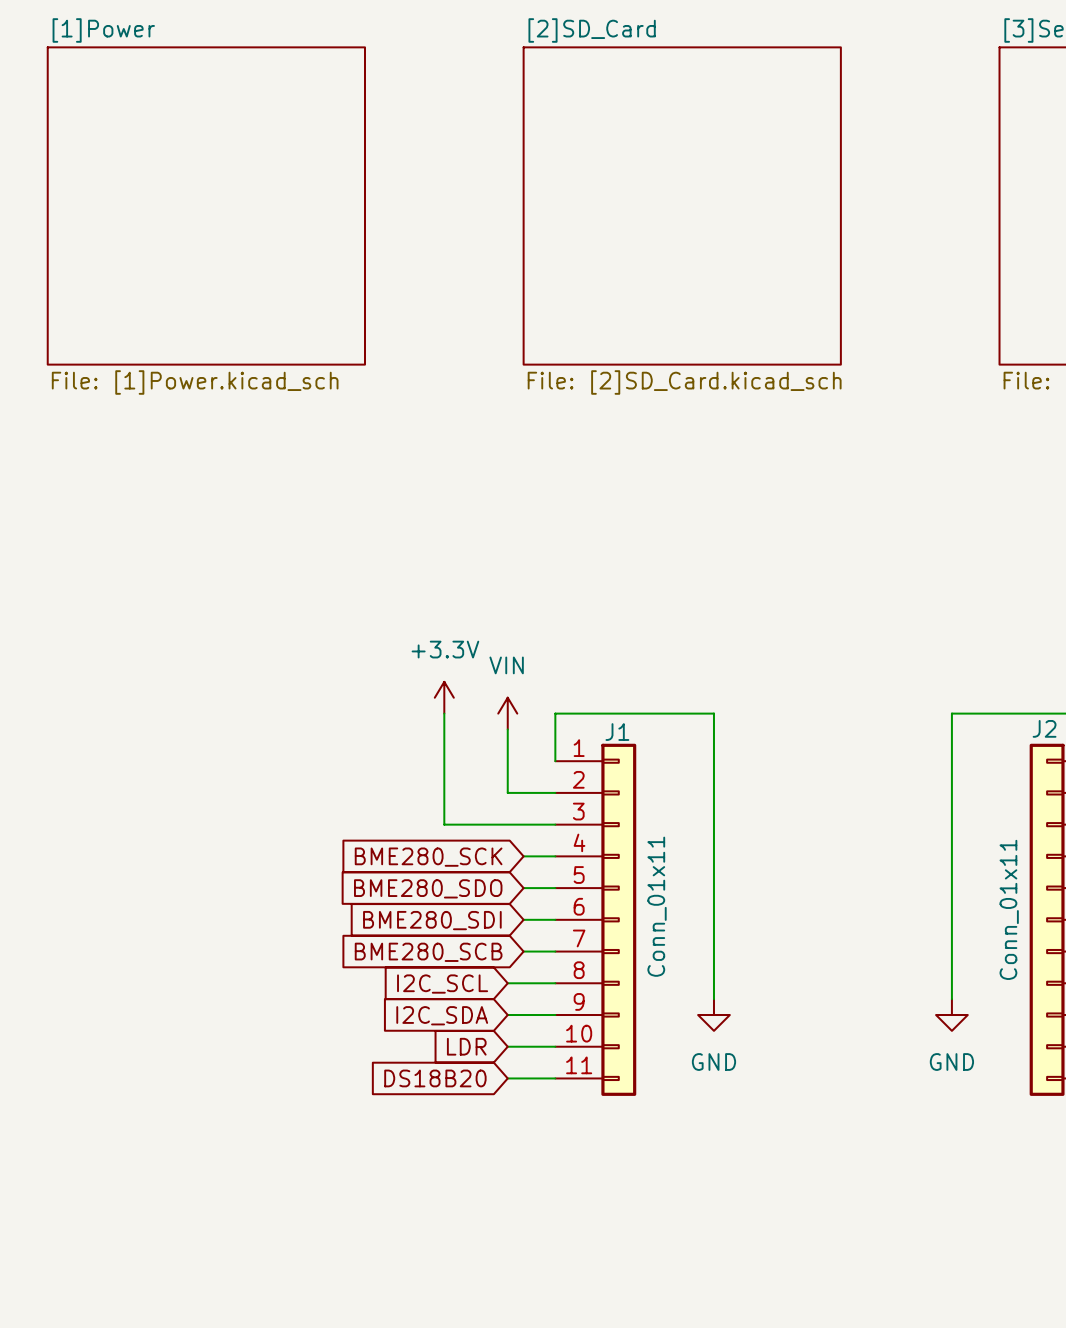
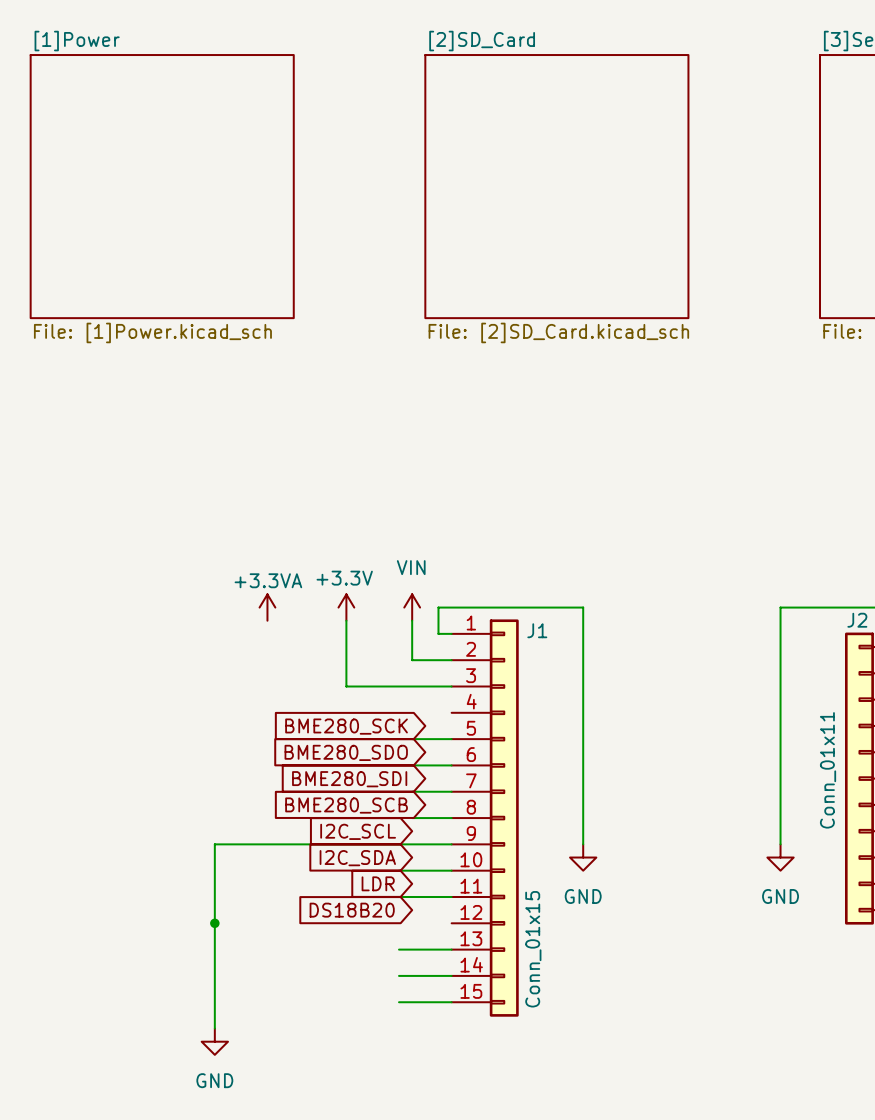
power symbol text position: +3.3V (445, 649) -> +3.3V (344, 578)
power symbol position: +3.3V (444, 697) -> +3.3V (346, 607)
power symbol: none -> +3.3VA (267, 607)
wire: (444, 713) (444, 824) (555, 824) -> none
wire: (555, 713) (555, 761) -> (451, 607) (438, 607) (438, 633) (451, 633)
wire: none -> (346, 620) (346, 686) (451, 686)
J1 name position: J1 (617, 732) -> J1 (537, 630)
J1 symbol: [555, 743, 637, 1096] -> [451, 619, 519, 1017]
wire: (507, 777) (507, 792) (555, 792) -> (412, 660) (451, 660)
wire: (523, 856) (555, 856) -> none
wire: (523, 888) (555, 888) -> none
J1 value: Conn_01x11 (657, 906) -> Conn_01x15 (533, 949)
wire: (523, 919) (555, 919) -> none
wire: (523, 951) (555, 951) -> none
wire: (507, 983) (555, 983) -> (412, 739) (451, 739)
wire: none -> (451, 844) (214, 844) (214, 1028)
wire: (507, 1015) (555, 1015) -> (412, 765) (451, 765)
wire: none -> (399, 870) (451, 870)
wire: (507, 1046) (555, 1046) -> (412, 791) (451, 791)
wire: none -> (399, 896) (451, 896)
wire: (507, 1078) (555, 1078) -> (412, 818) (451, 818)
junction: none -> (214, 923)
wire: none -> (399, 949) (451, 949)
wire: none -> (399, 975) (451, 975)
wire: none -> (399, 1002) (451, 1002)
power symbol: none -> GND (214, 1041)

